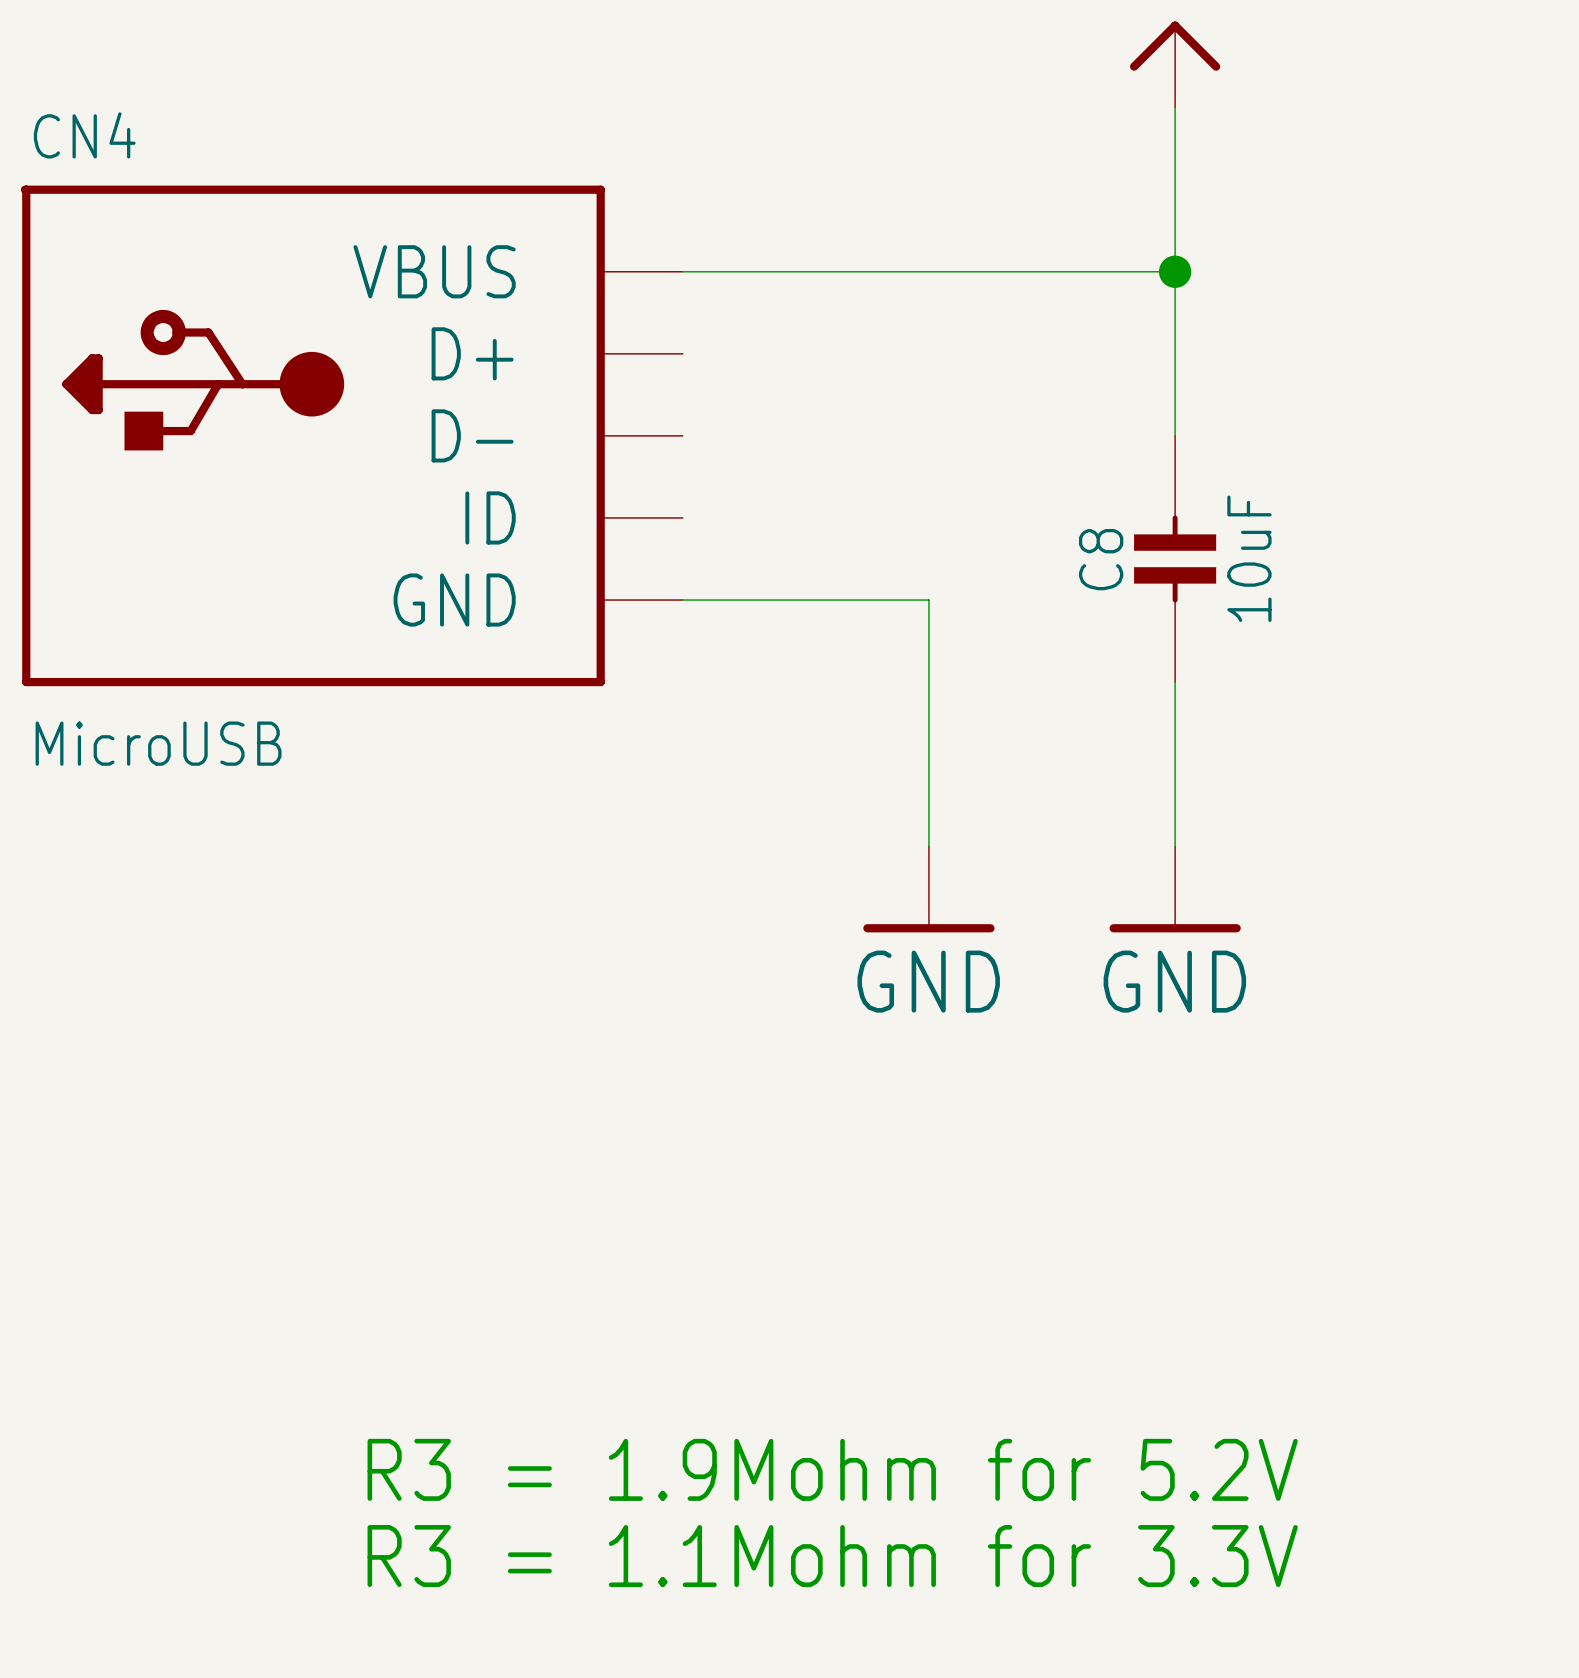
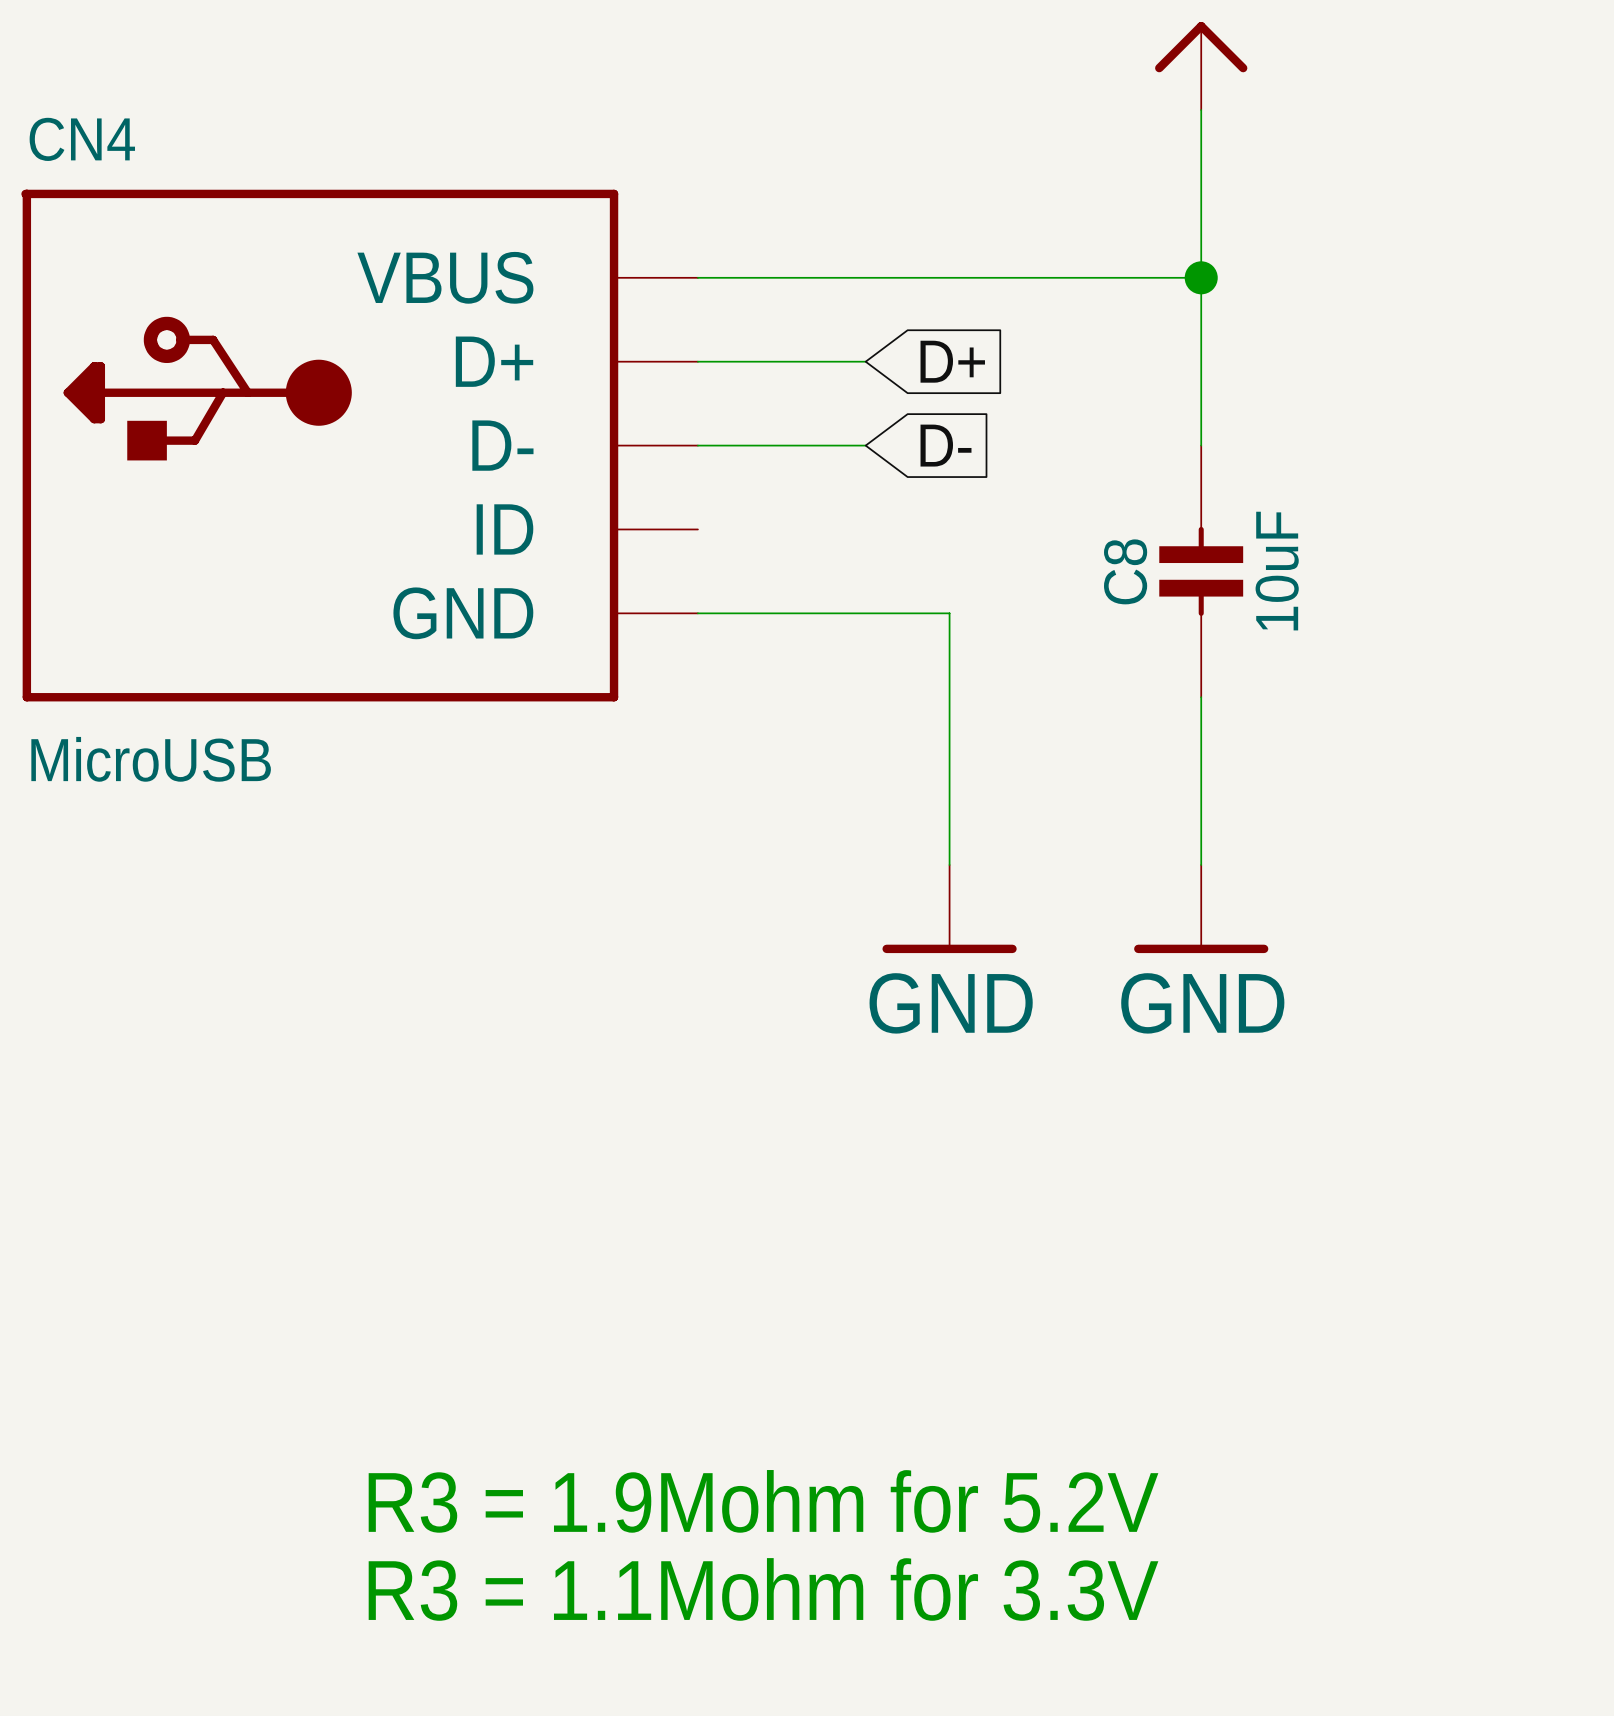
wire: none -> (697, 361) (865, 361)
global label: none -> D+ (952, 361)
wire: none -> (697, 445) (865, 445)
global label: none -> D- (946, 445)

